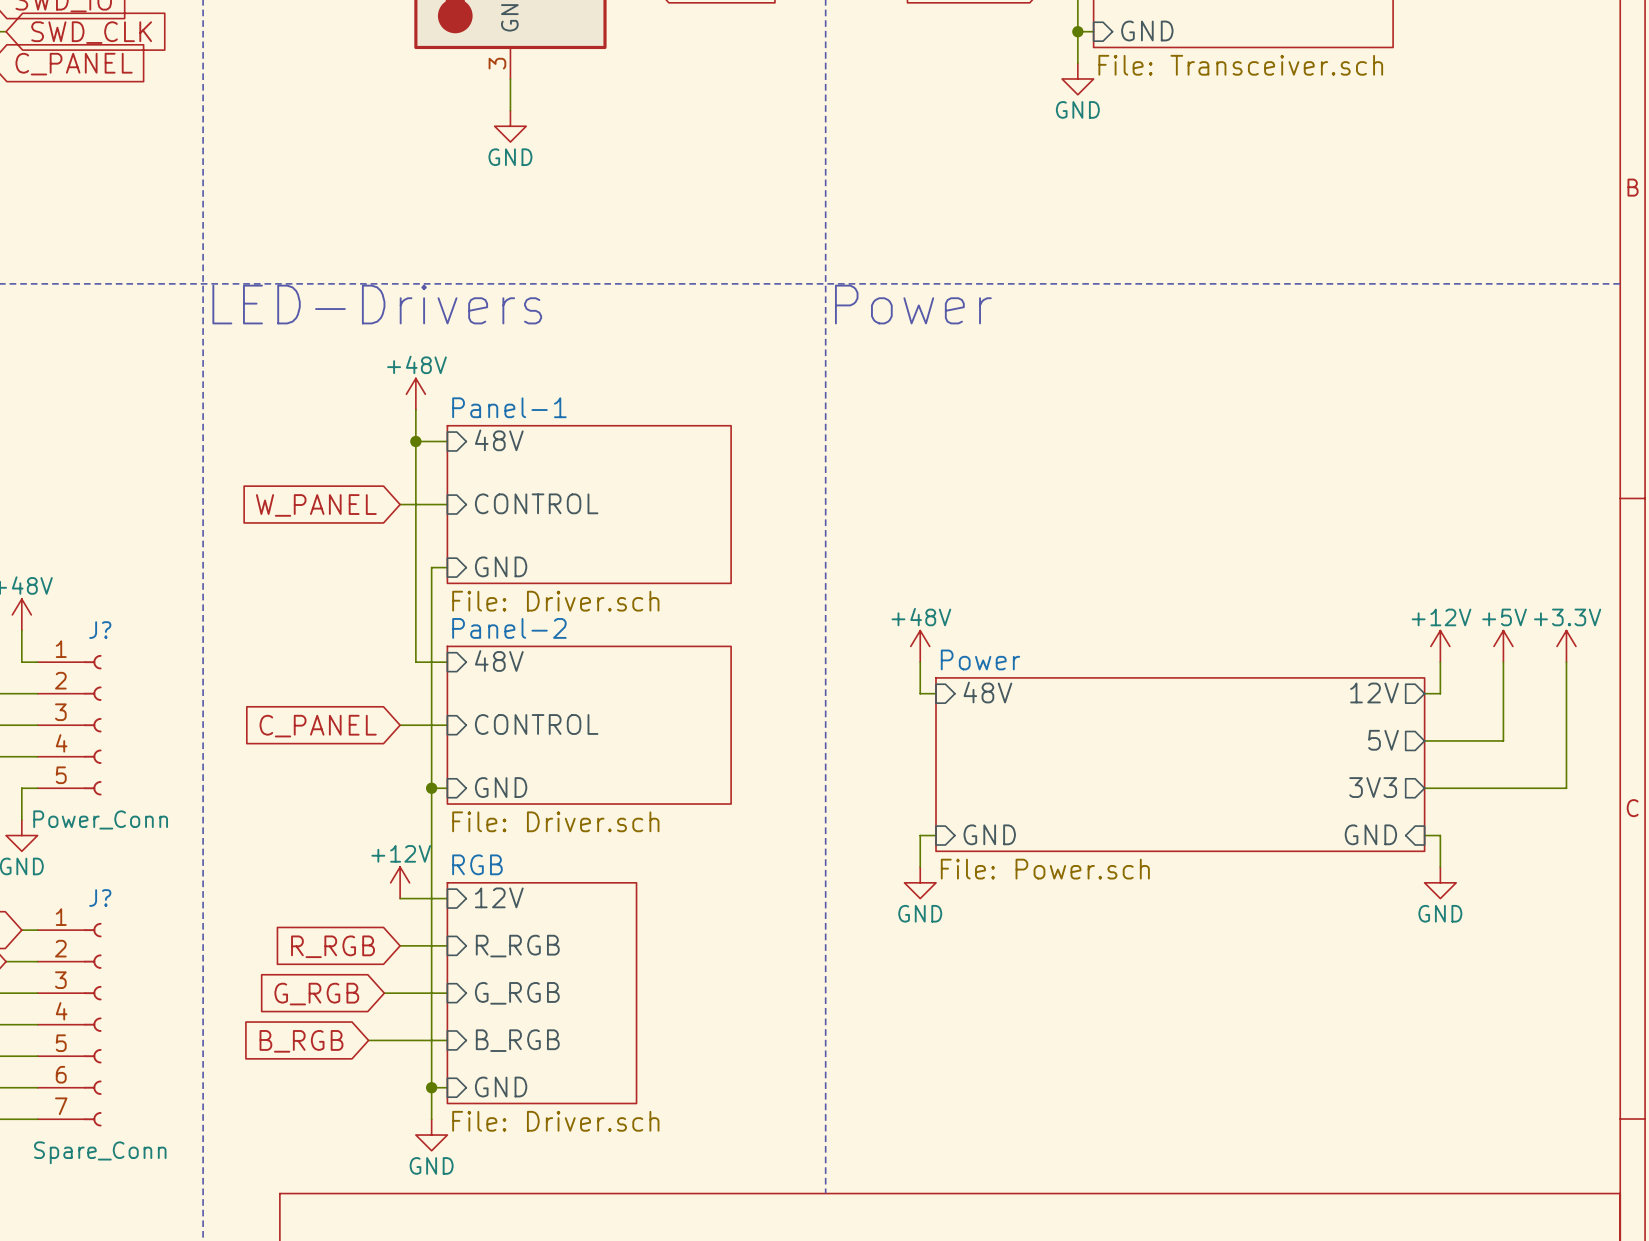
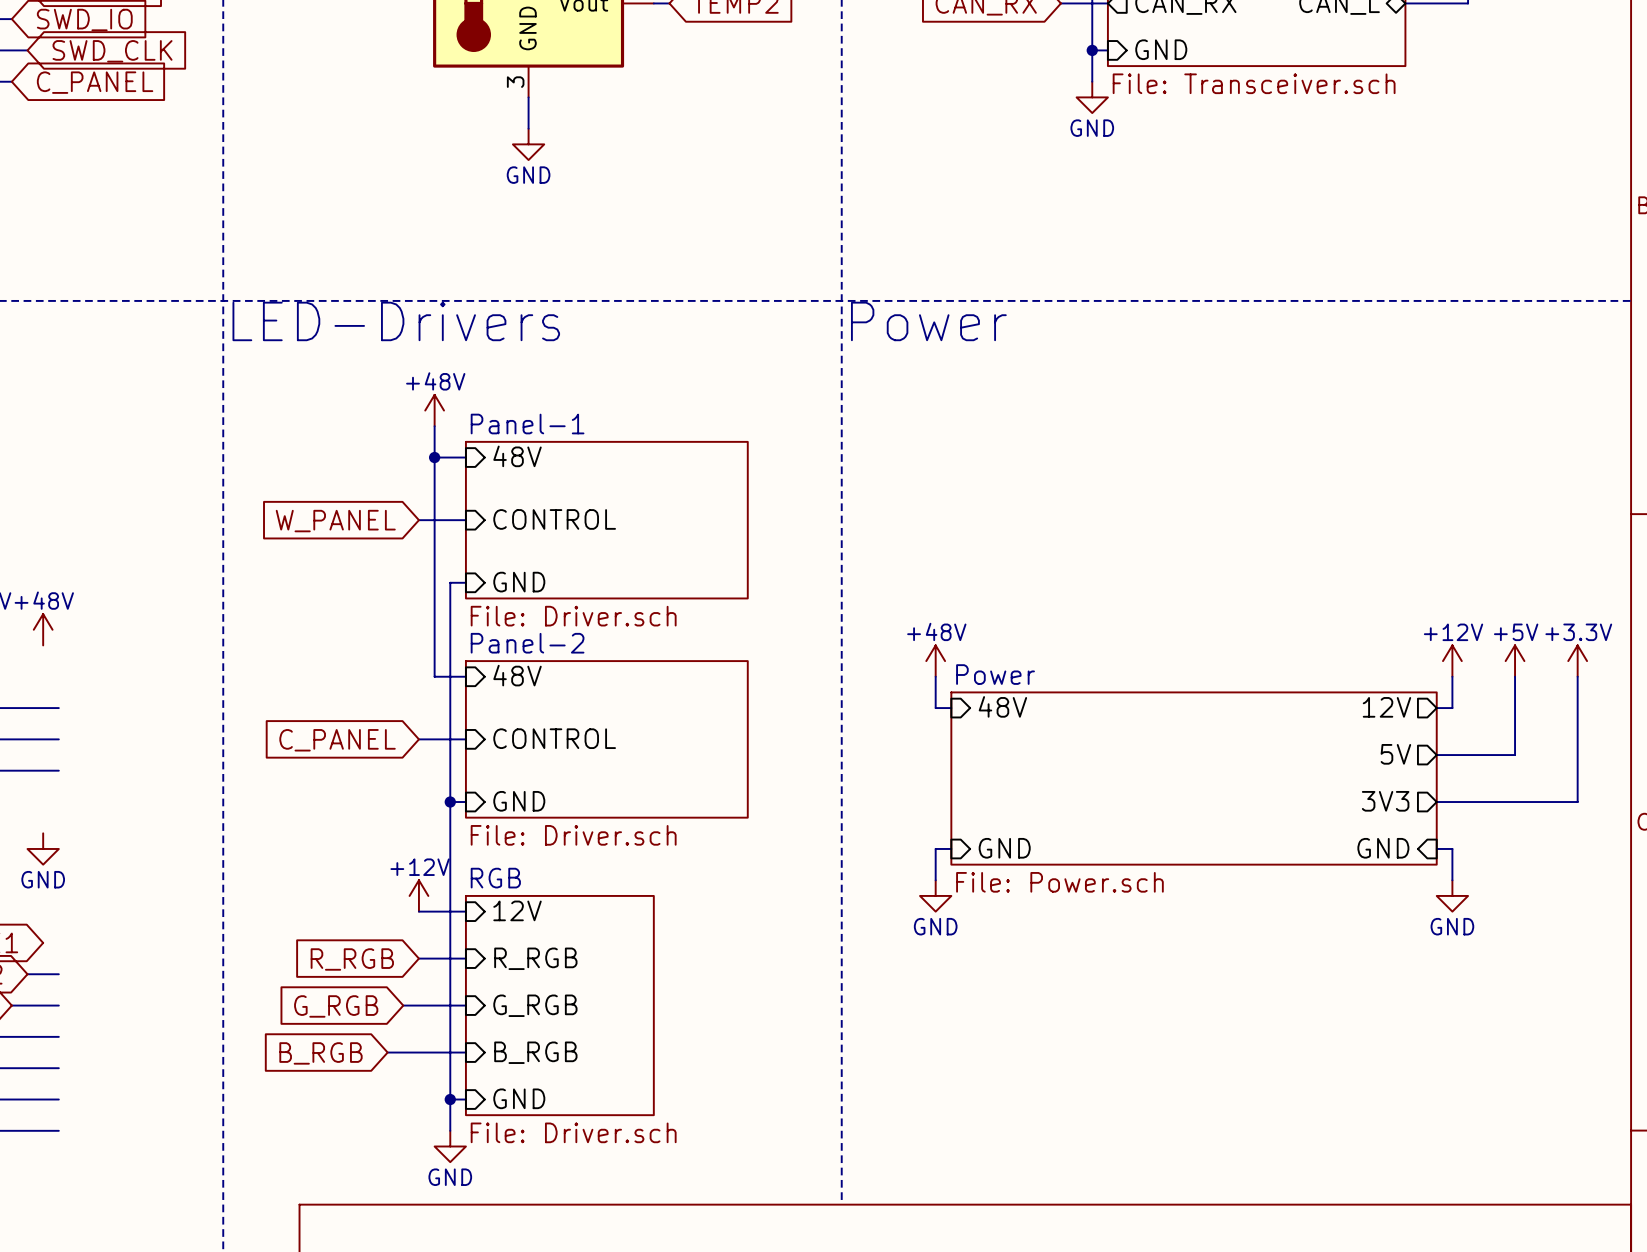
wire: (21, 630) (21, 662) (37, 662) -> none
J?: Power_Conn (69, 725) -> none
wire: (37, 788) (21, 788) (21, 819) -> none
wire: (21, 930) (37, 930) -> none
J?: Spare_Conn (69, 1024) -> none

